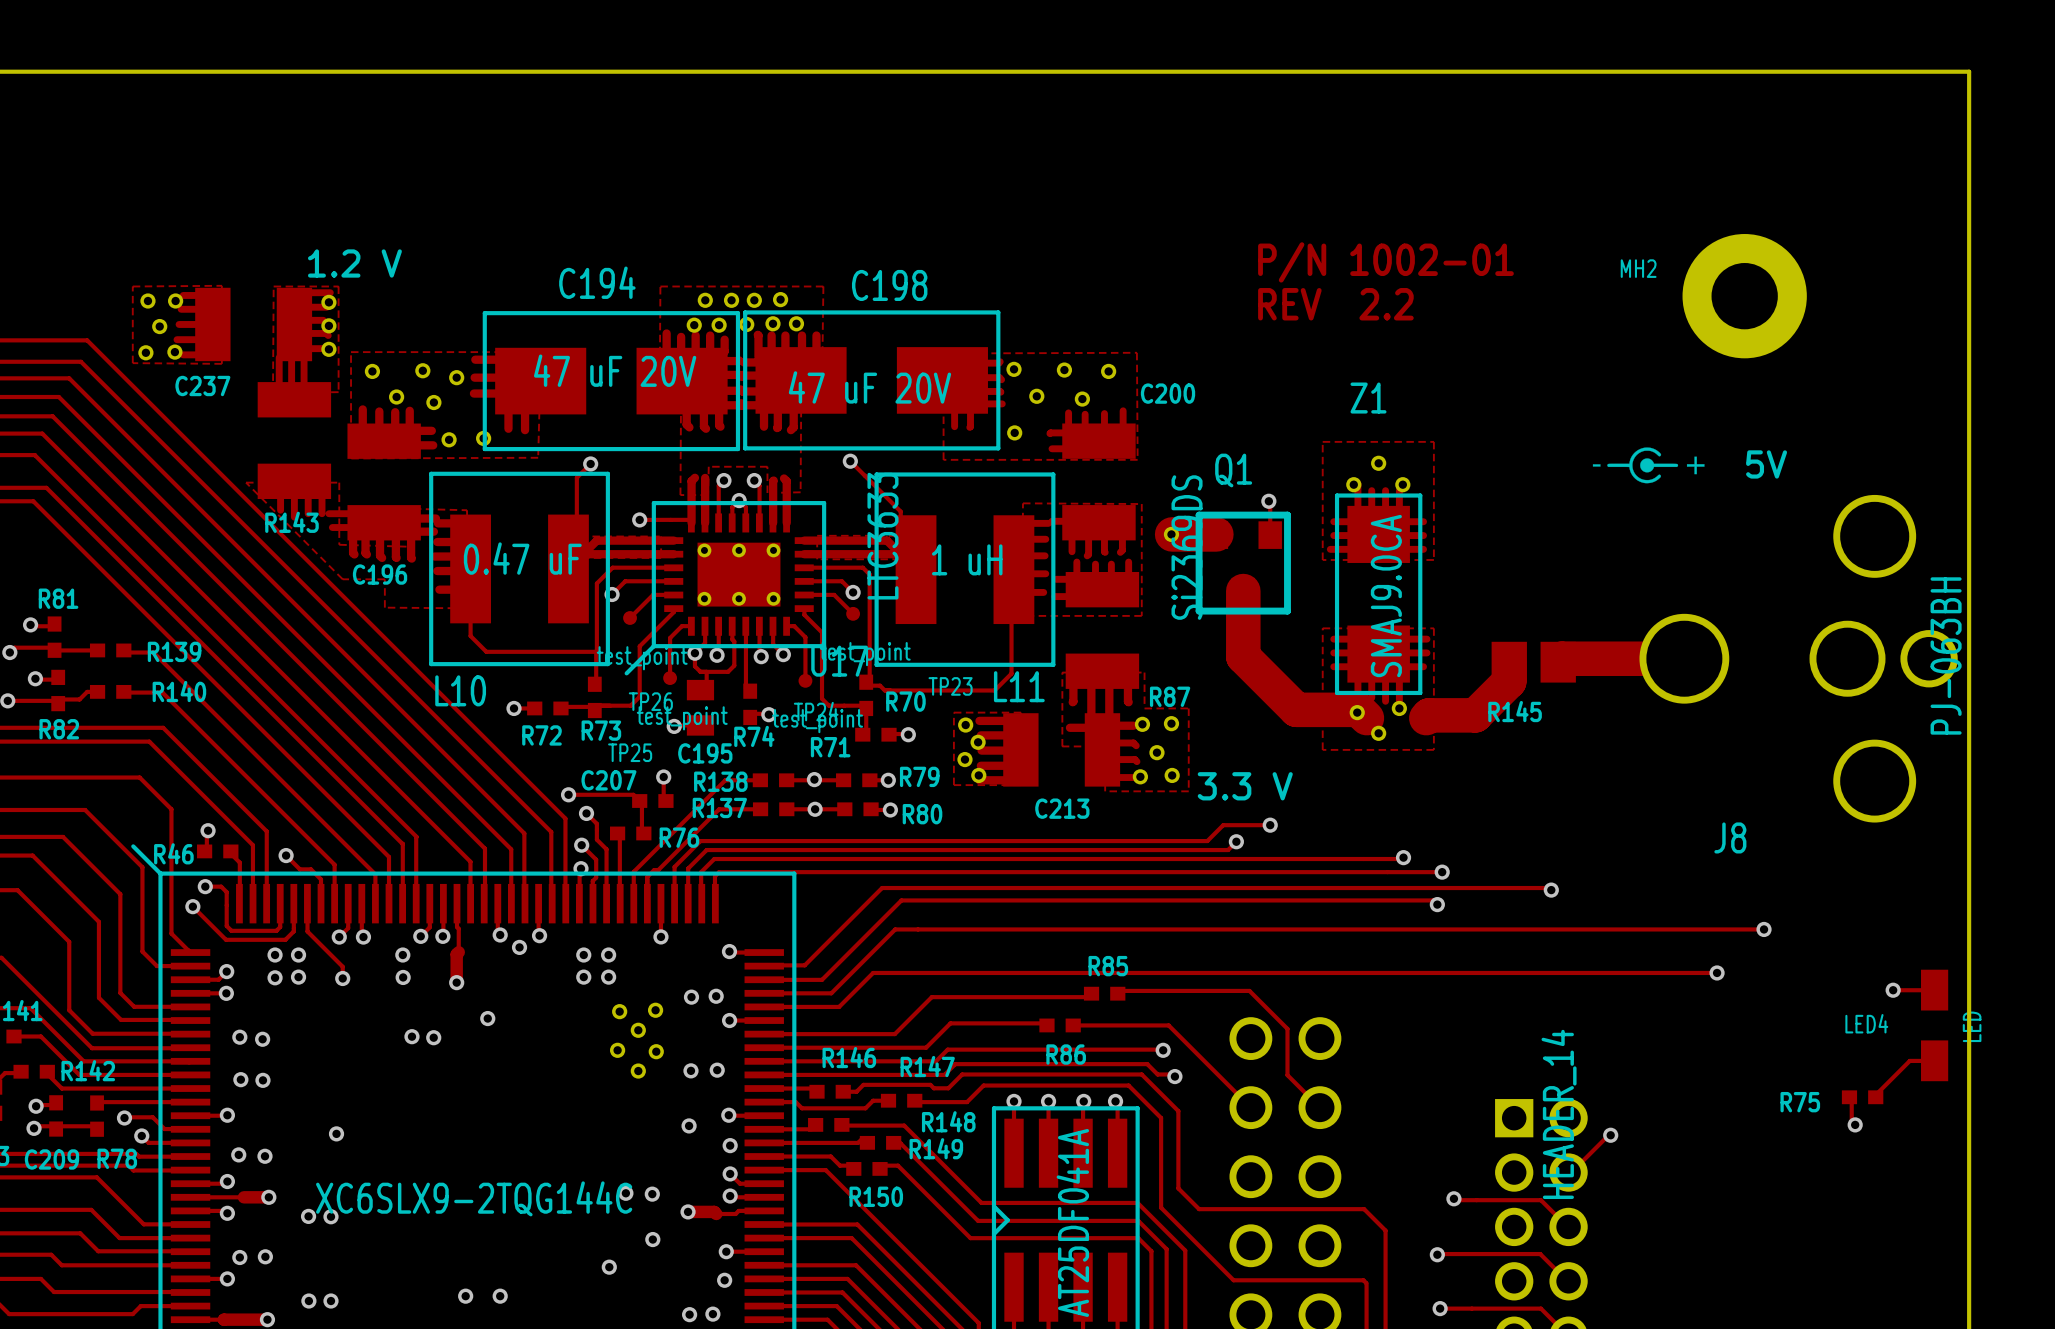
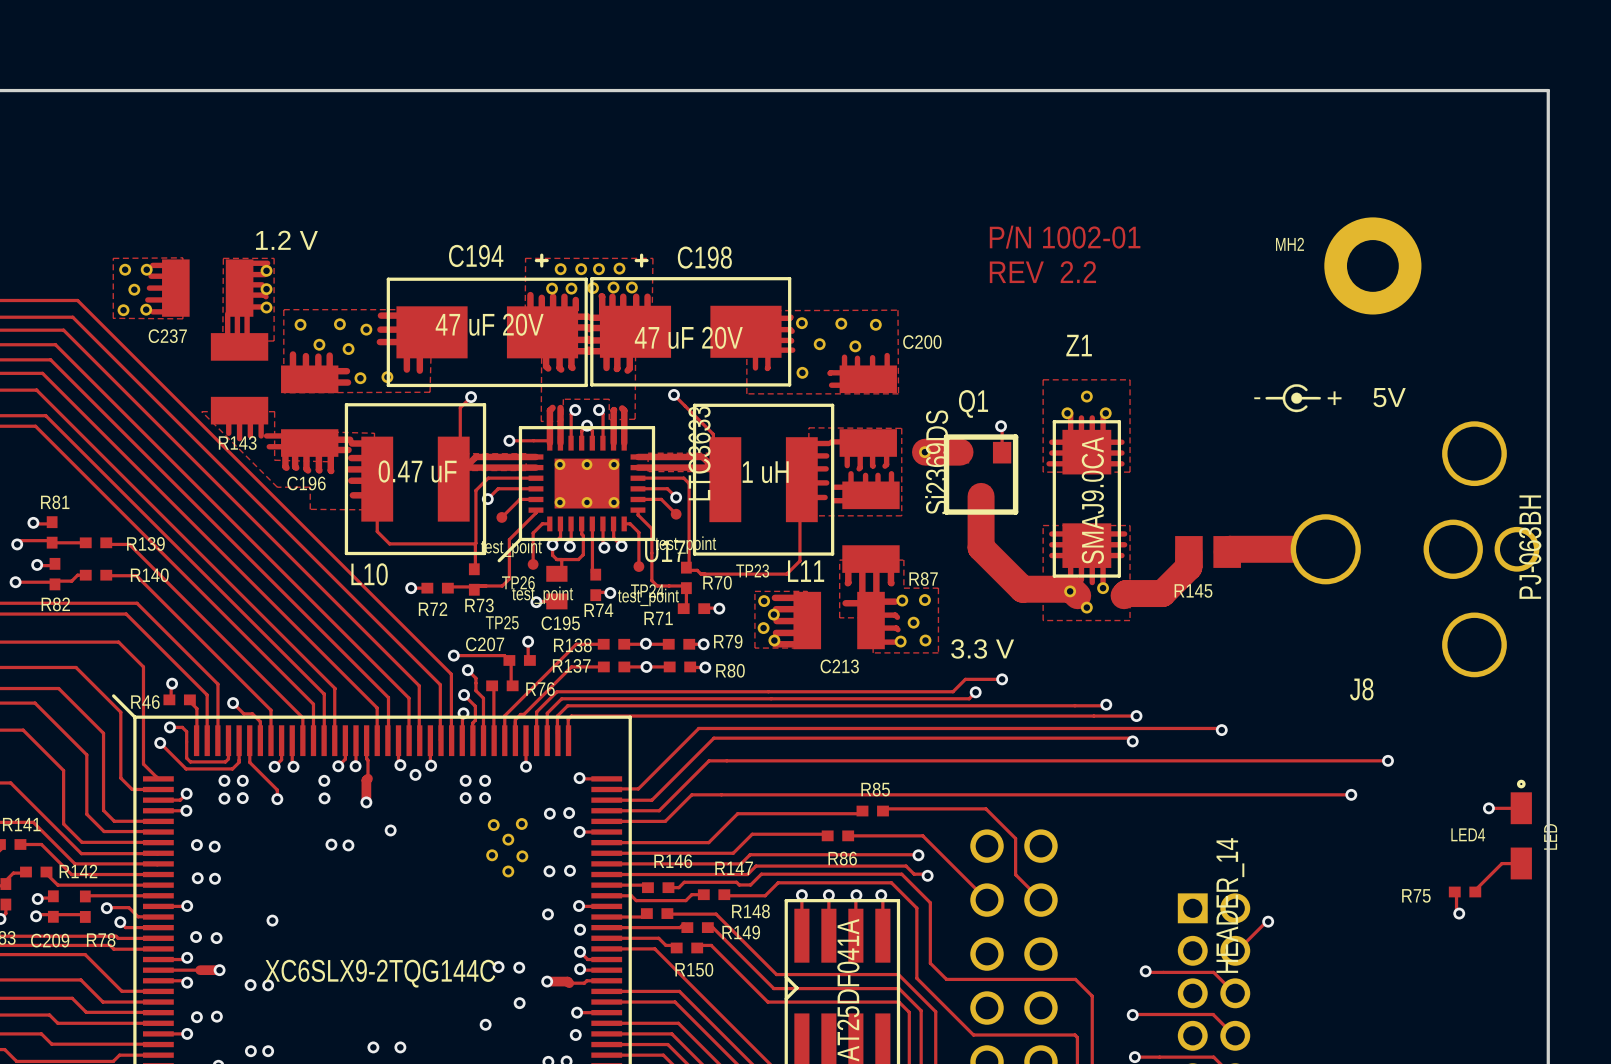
line: none -> (541, 255) (541, 265)
line: none -> (641, 255) (641, 265)
line: none -> (536, 260) (547, 260)
line: none -> (636, 260) (647, 260)
drawing: none -> [1516, 779, 1526, 789]

